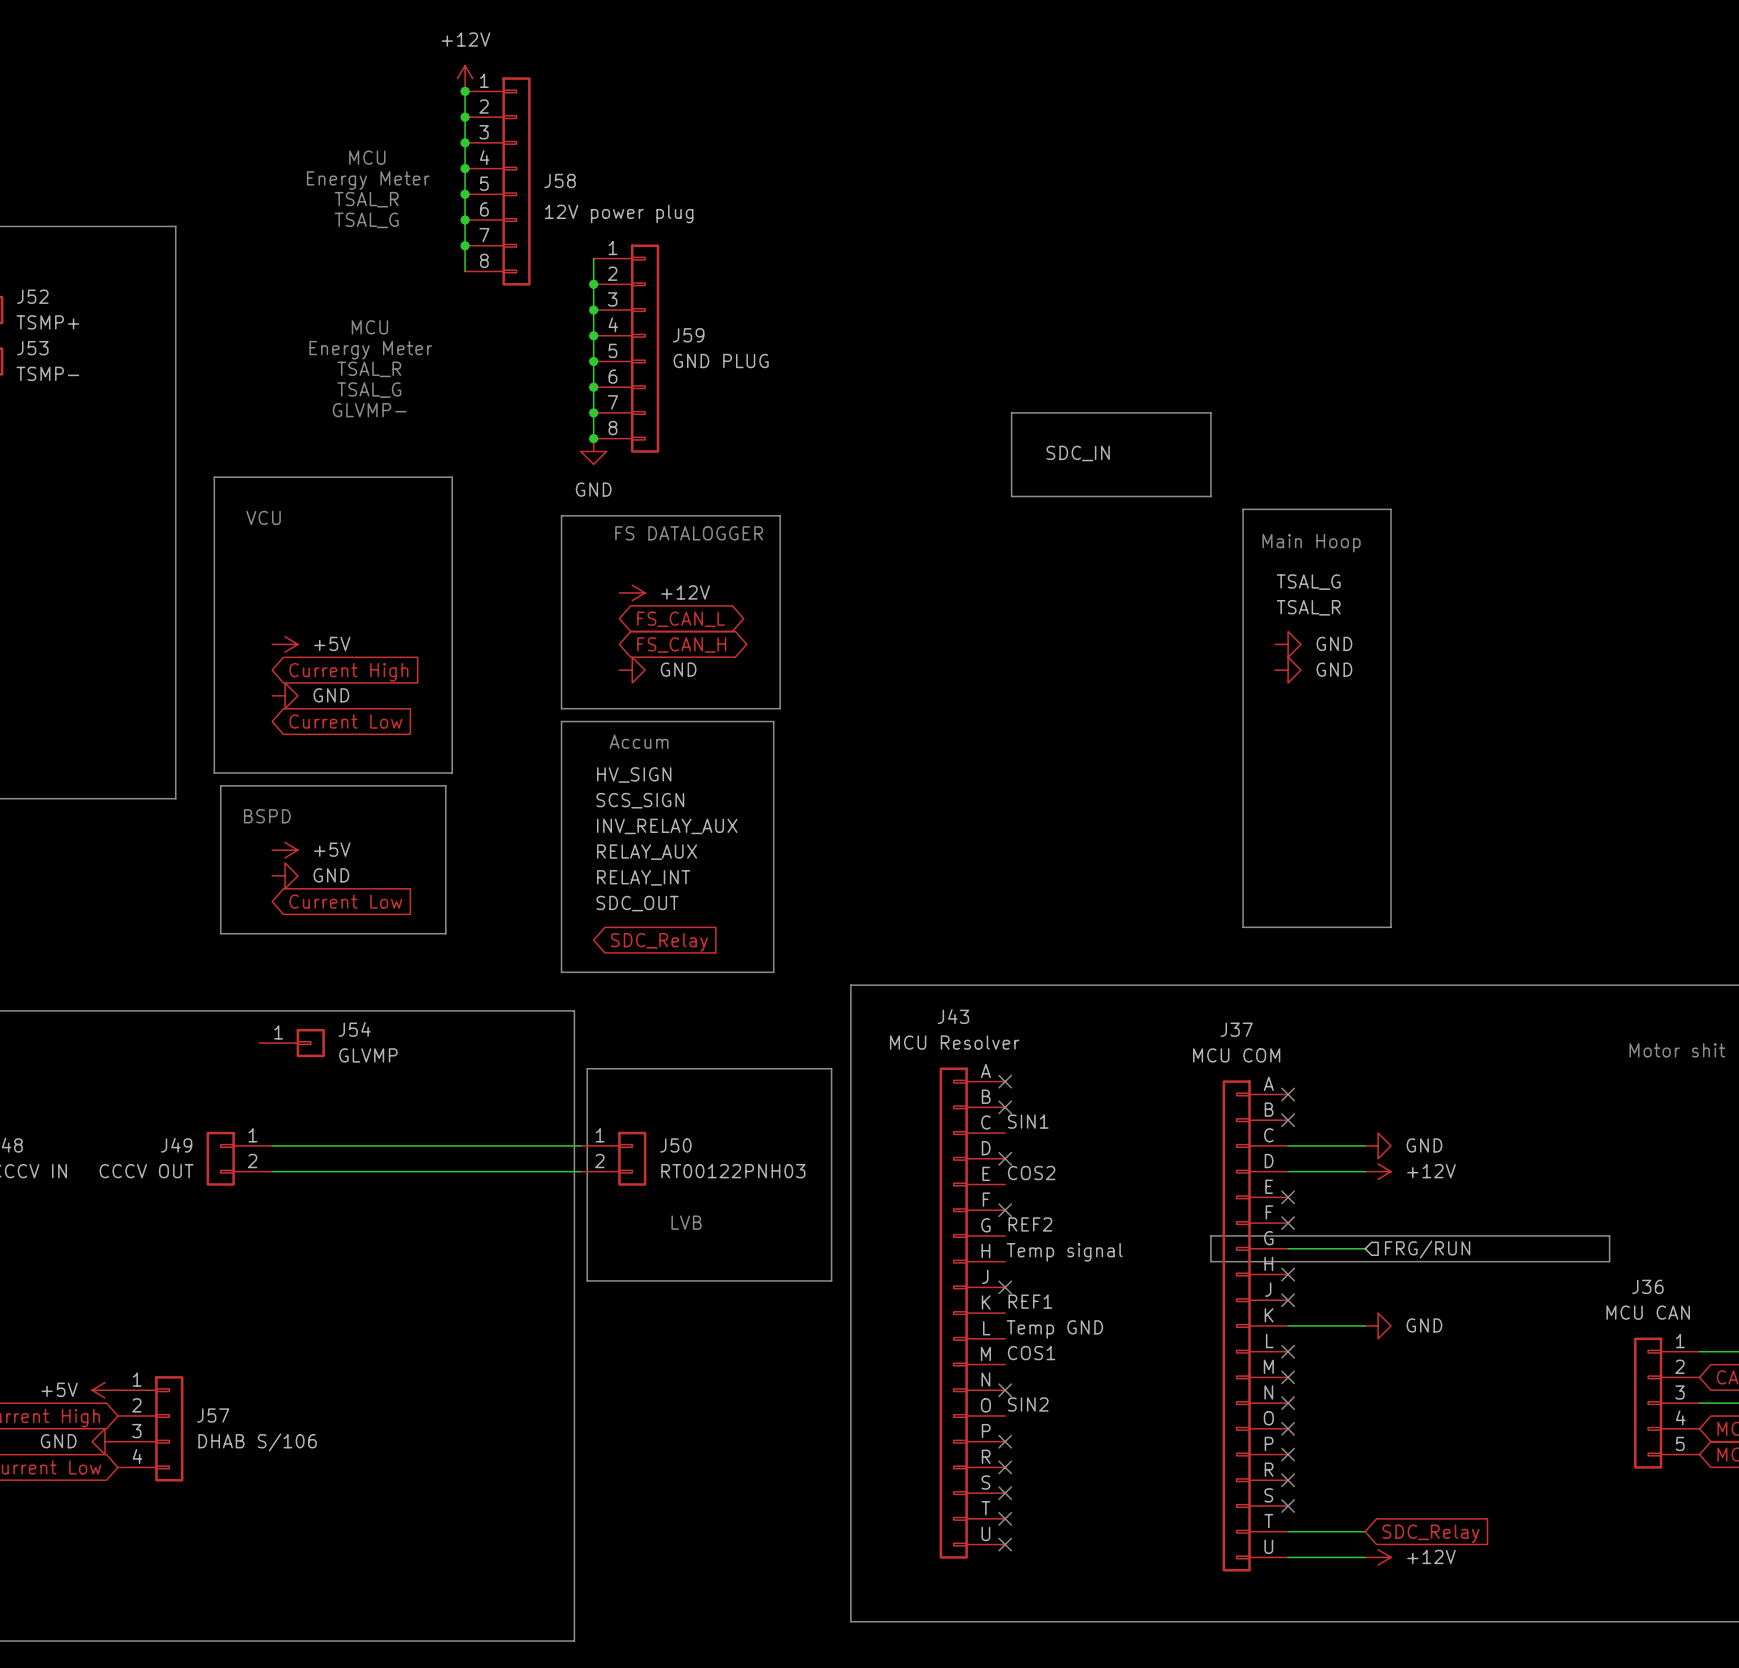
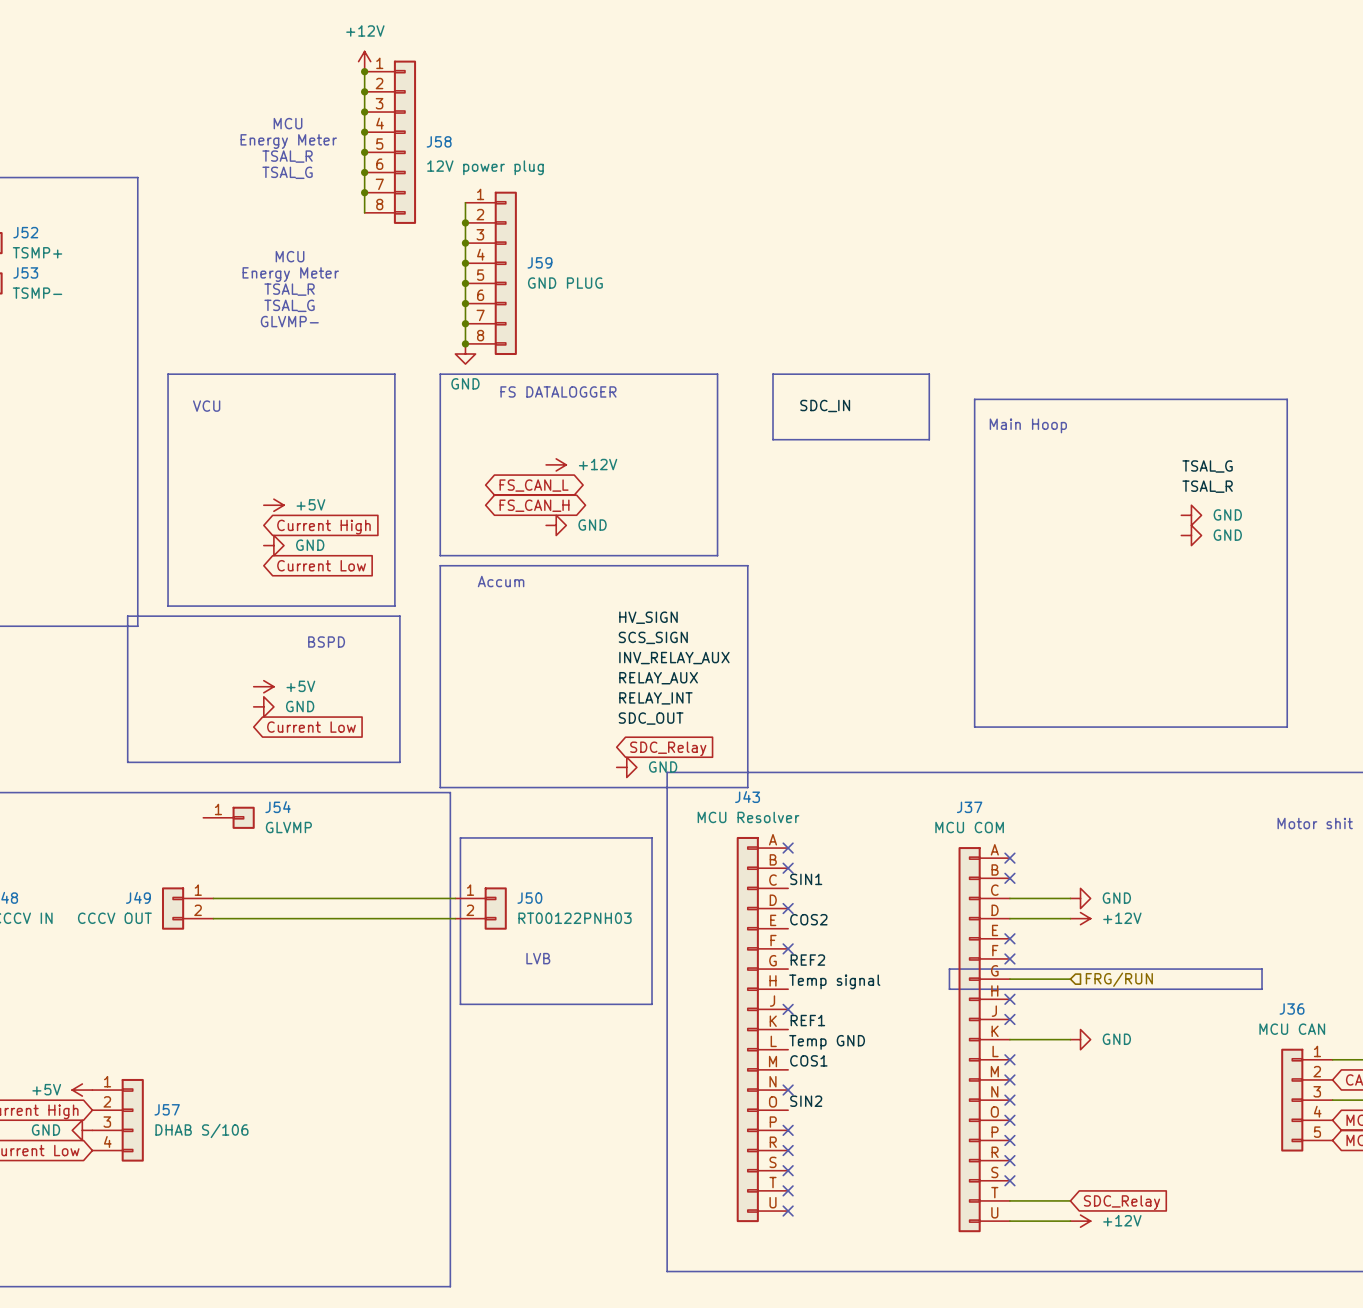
line: (1011, 412) (1210, 412) (1210, 496) (1011, 496) (1011, 412) -> (773, 374) (929, 374) (929, 439) (773, 439) (773, 374)
label position: SDC_IN (1078, 453) -> SDC_IN (825, 405)
line: (452, 477) (452, 772) -> (354, 374) (394, 374) (394, 606) (354, 606)
line: (1390, 509) (1390, 927) -> (1090, 399) (1287, 399) (1287, 727) (1090, 727)
line: (561, 515) (780, 515) (780, 708) -> (440, 404) (440, 374) (717, 374) (717, 555) (611, 555)
text position: FS DATALOGGER (689, 533) -> FS DATALOGGER (558, 391)
label position: TSAL_G (1308, 582) -> TSAL_G (1207, 466)
power symbol position: +12V (632, 592) -> +12V (556, 464)
label position: TSAL_R (1308, 607) -> TSAL_R (1207, 486)
power symbol position: +5V (285, 644) -> +5V (273, 505)
power symbol: GND (1288, 644) -> none
power symbol: none -> GND (1191, 515)
power symbol position: GND (632, 670) -> GND (556, 525)
power symbol: GND (1288, 670) -> none
global label position: Current High (348, 672) -> Current High (323, 527)
power symbol: none -> GND (1191, 535)
power symbol position: GND (285, 695) -> GND (273, 545)
global label position: Current Low (345, 721) -> Current Low (321, 565)
line: (773, 721) (773, 972) (561, 972) -> (606, 565) (747, 565) (747, 787) (440, 787) (440, 762)
label position: HV_SIGN (634, 774) -> HV_SIGN (648, 617)
line: (220, 785) (220, 933) (445, 933) (445, 785) -> (173, 616) (127, 616) (127, 762) (399, 762) (399, 616) (349, 616)
label position: SCS_SIGN (640, 800) -> SCS_SIGN (653, 637)
text position: BSPD (267, 816) -> BSPD (326, 642)
label position: INV_RELAY_AUX (667, 826) -> INV_RELAY_AUX (674, 658)
power symbol position: +5V (285, 850) -> +5V (263, 686)
label position: RELAY_AUX (647, 852) -> RELAY_AUX (658, 678)
power symbol position: GND (285, 875) -> GND (263, 706)
label position: RELAY_INT (643, 877) -> RELAY_INT (655, 698)
global label position: Current Low (345, 901) -> Current Low (311, 727)
label position: SDC_OUT (637, 903) -> SDC_OUT (651, 718)
global label position: SDC_Relay (659, 942) -> SDC_Relay (668, 748)
power symbol: none -> GND (626, 767)

